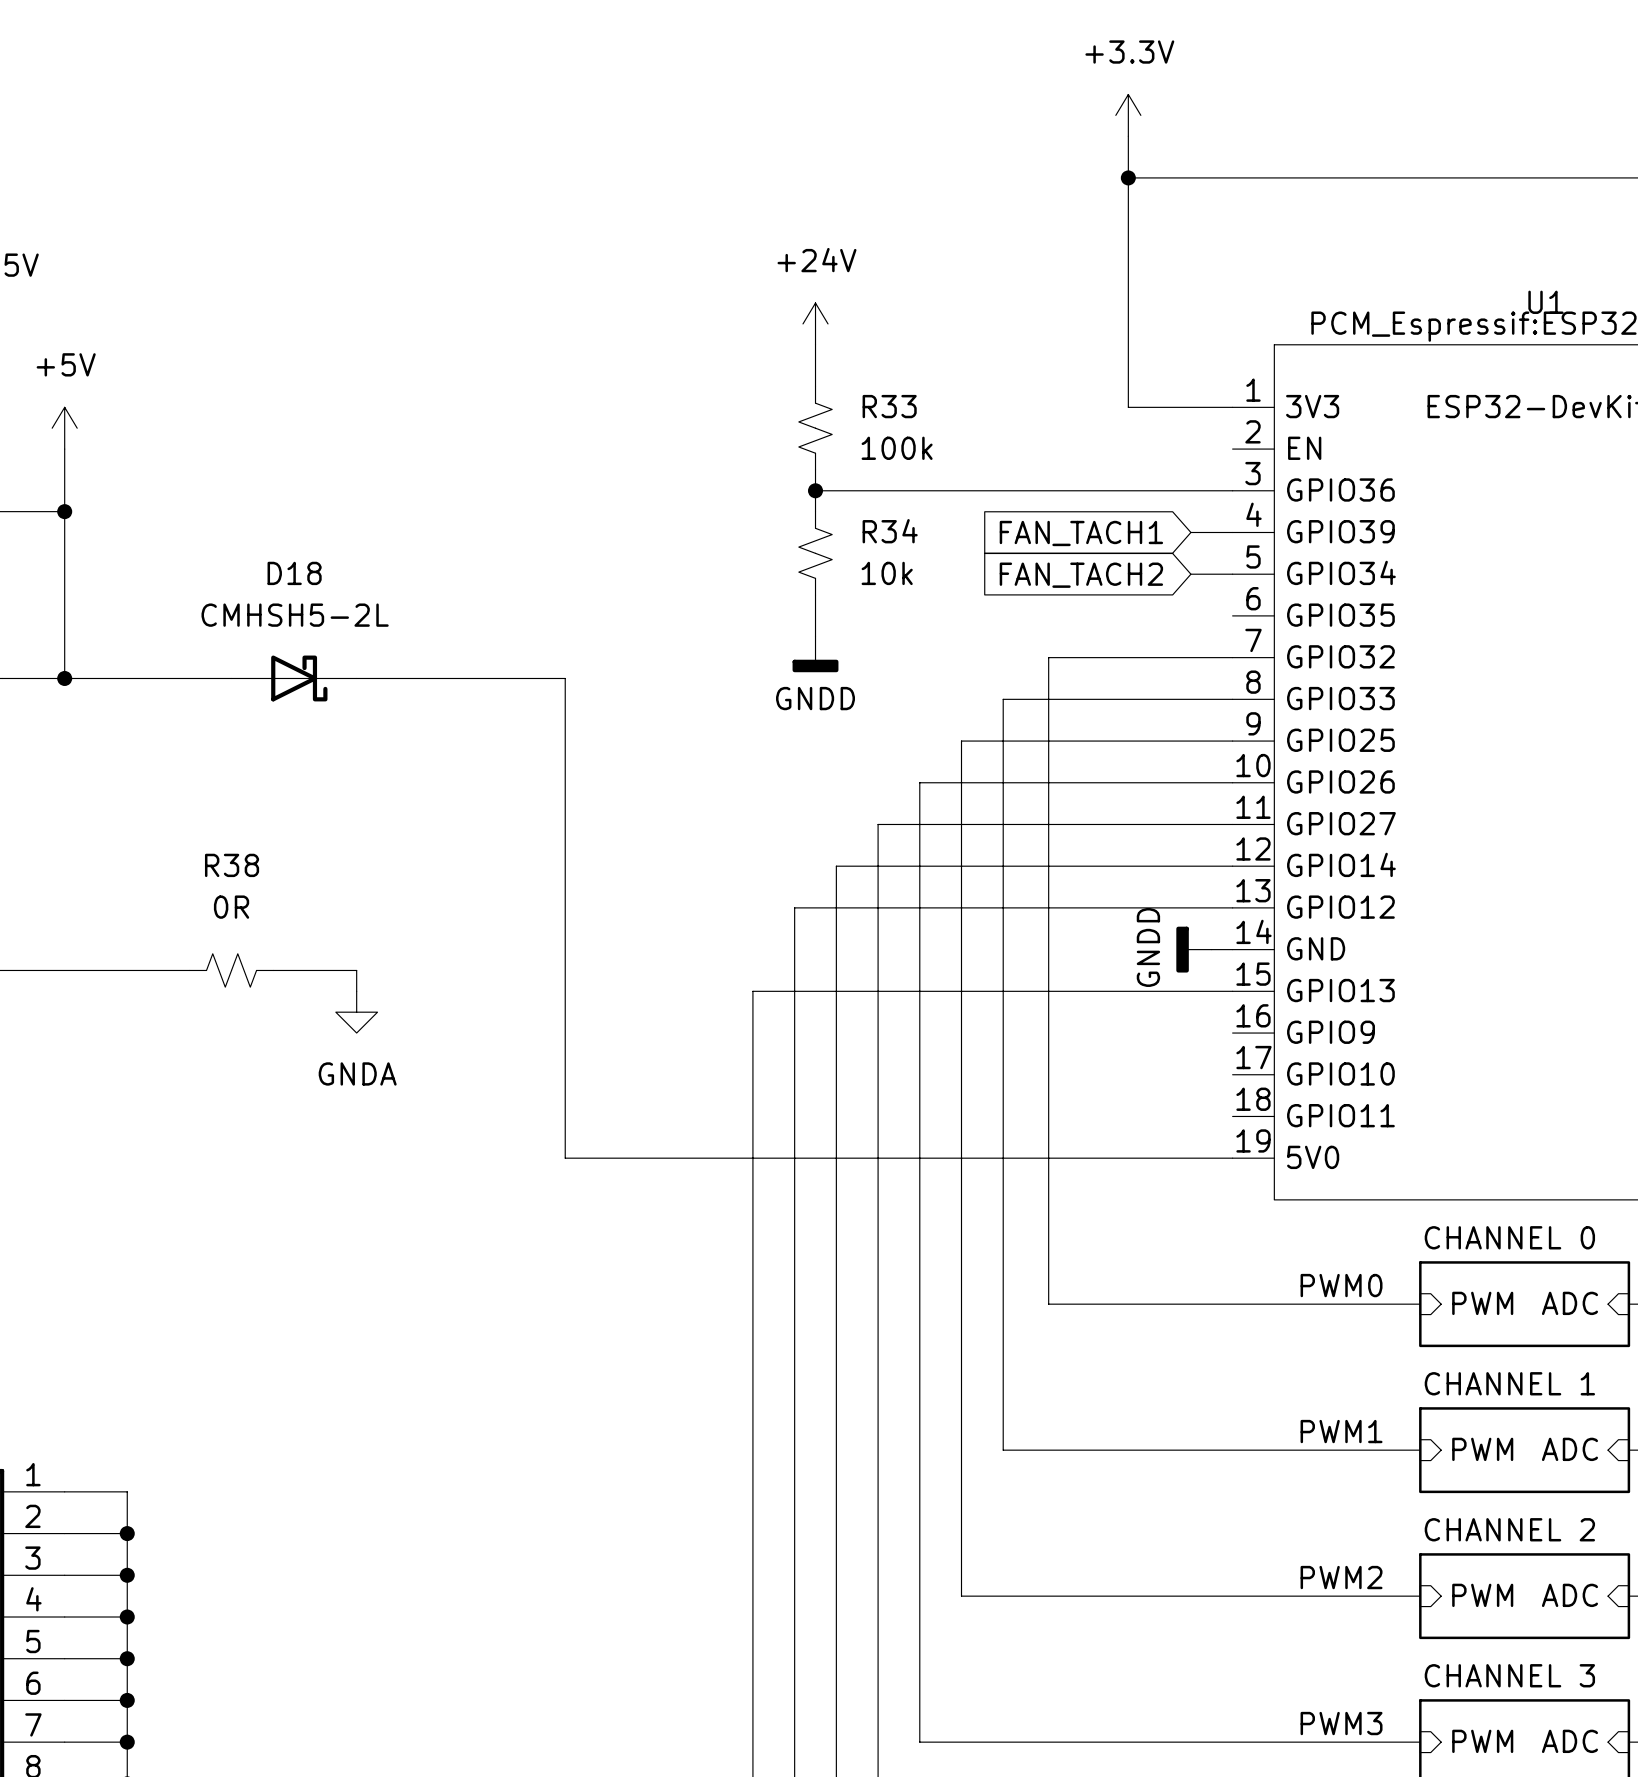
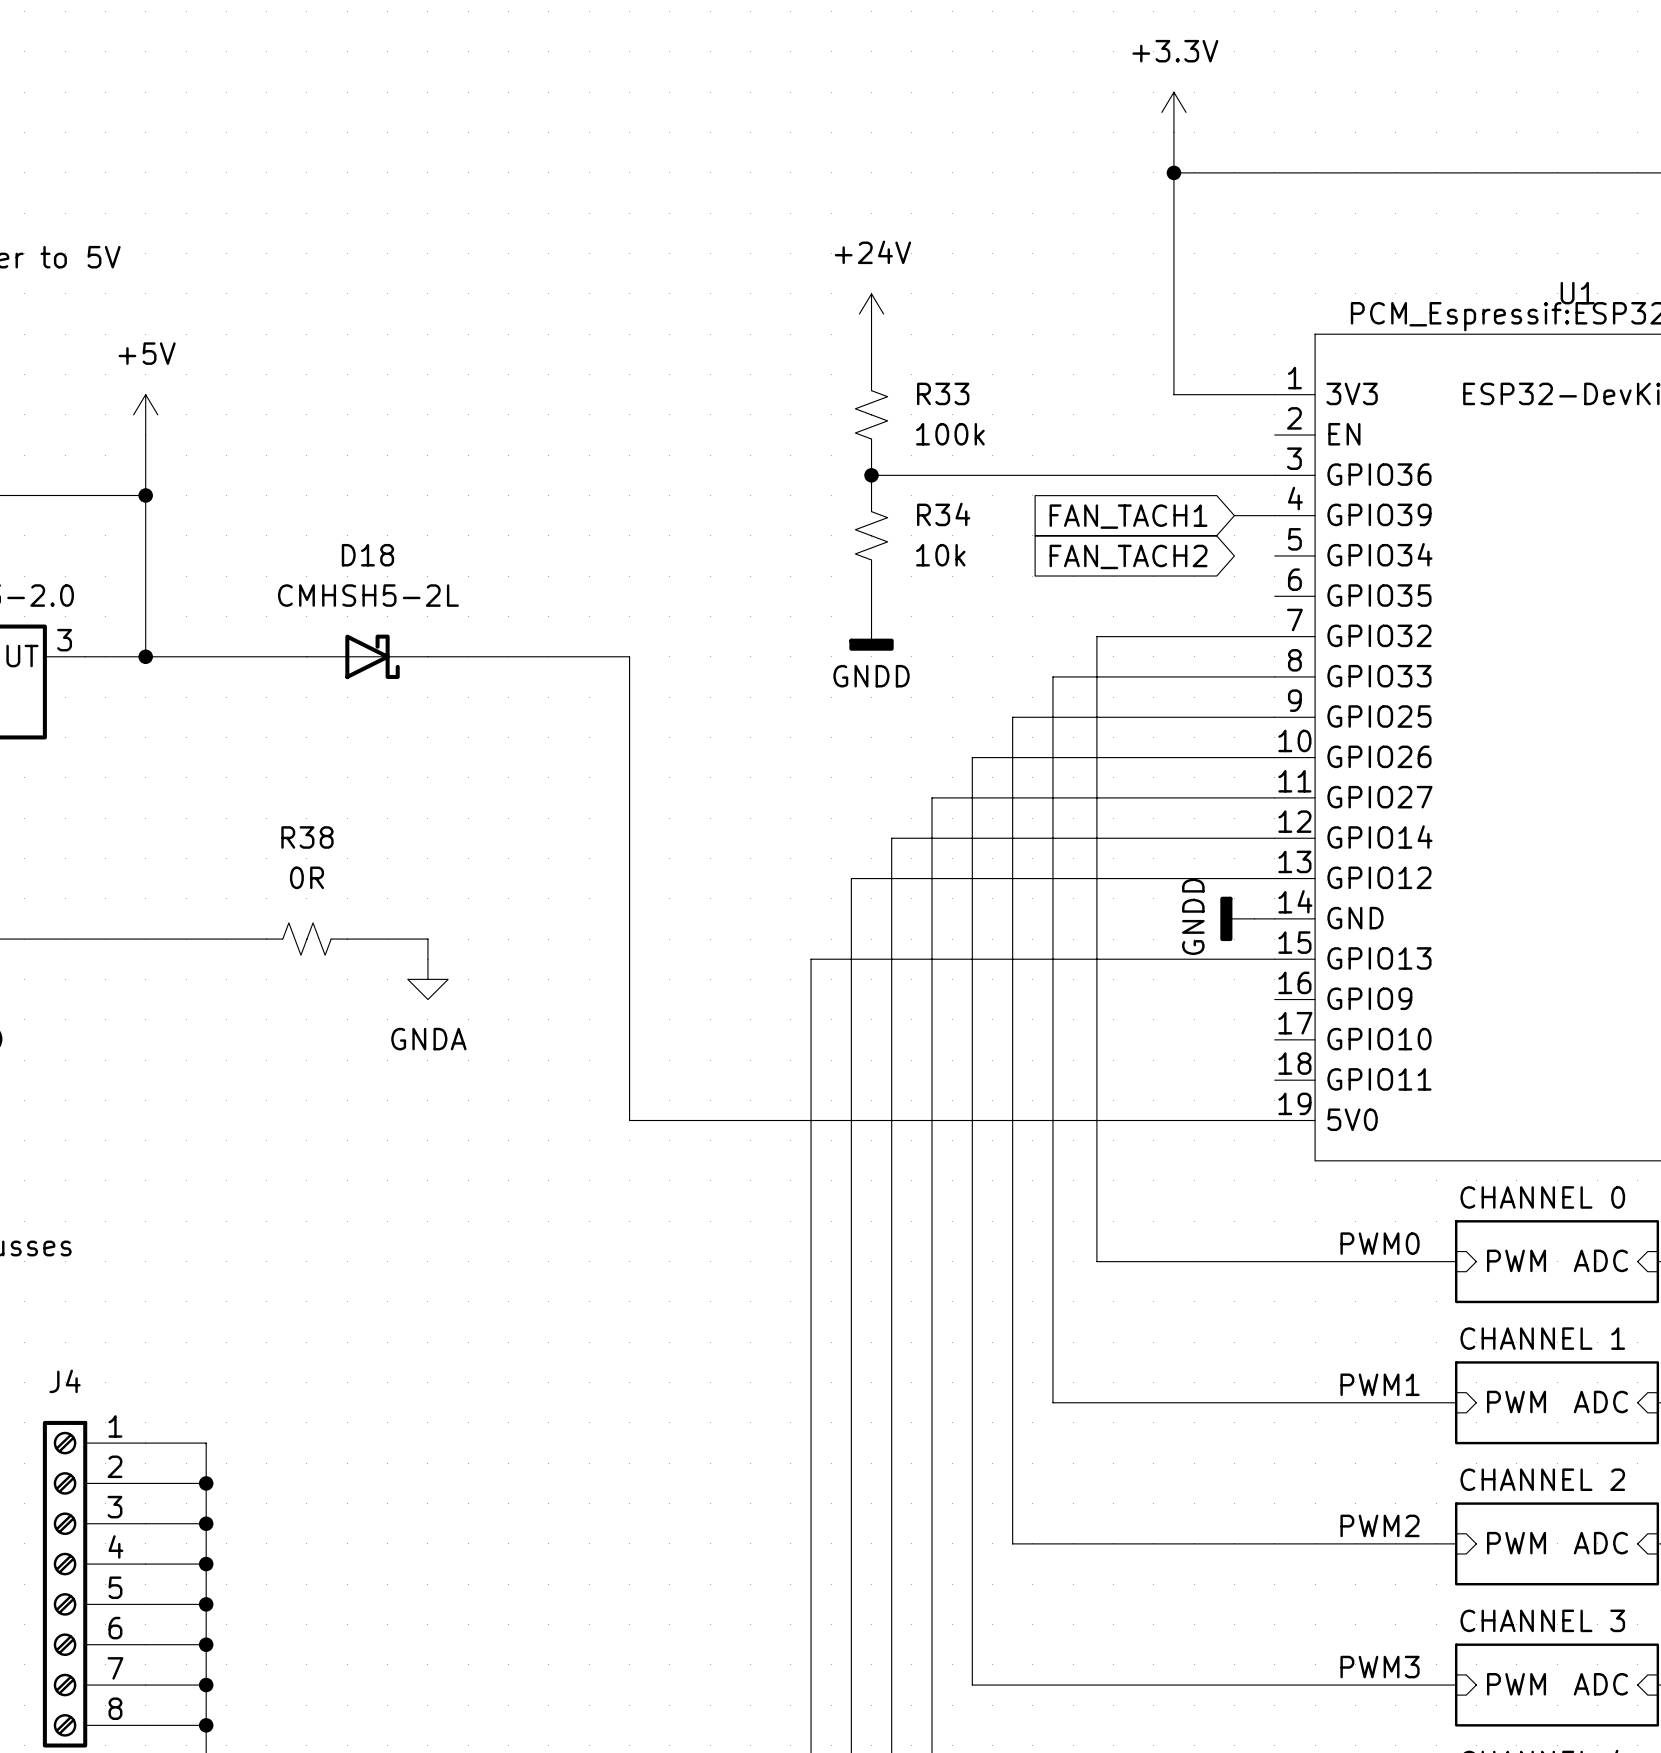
wire: (1190, 574) (1232, 574) -> none

